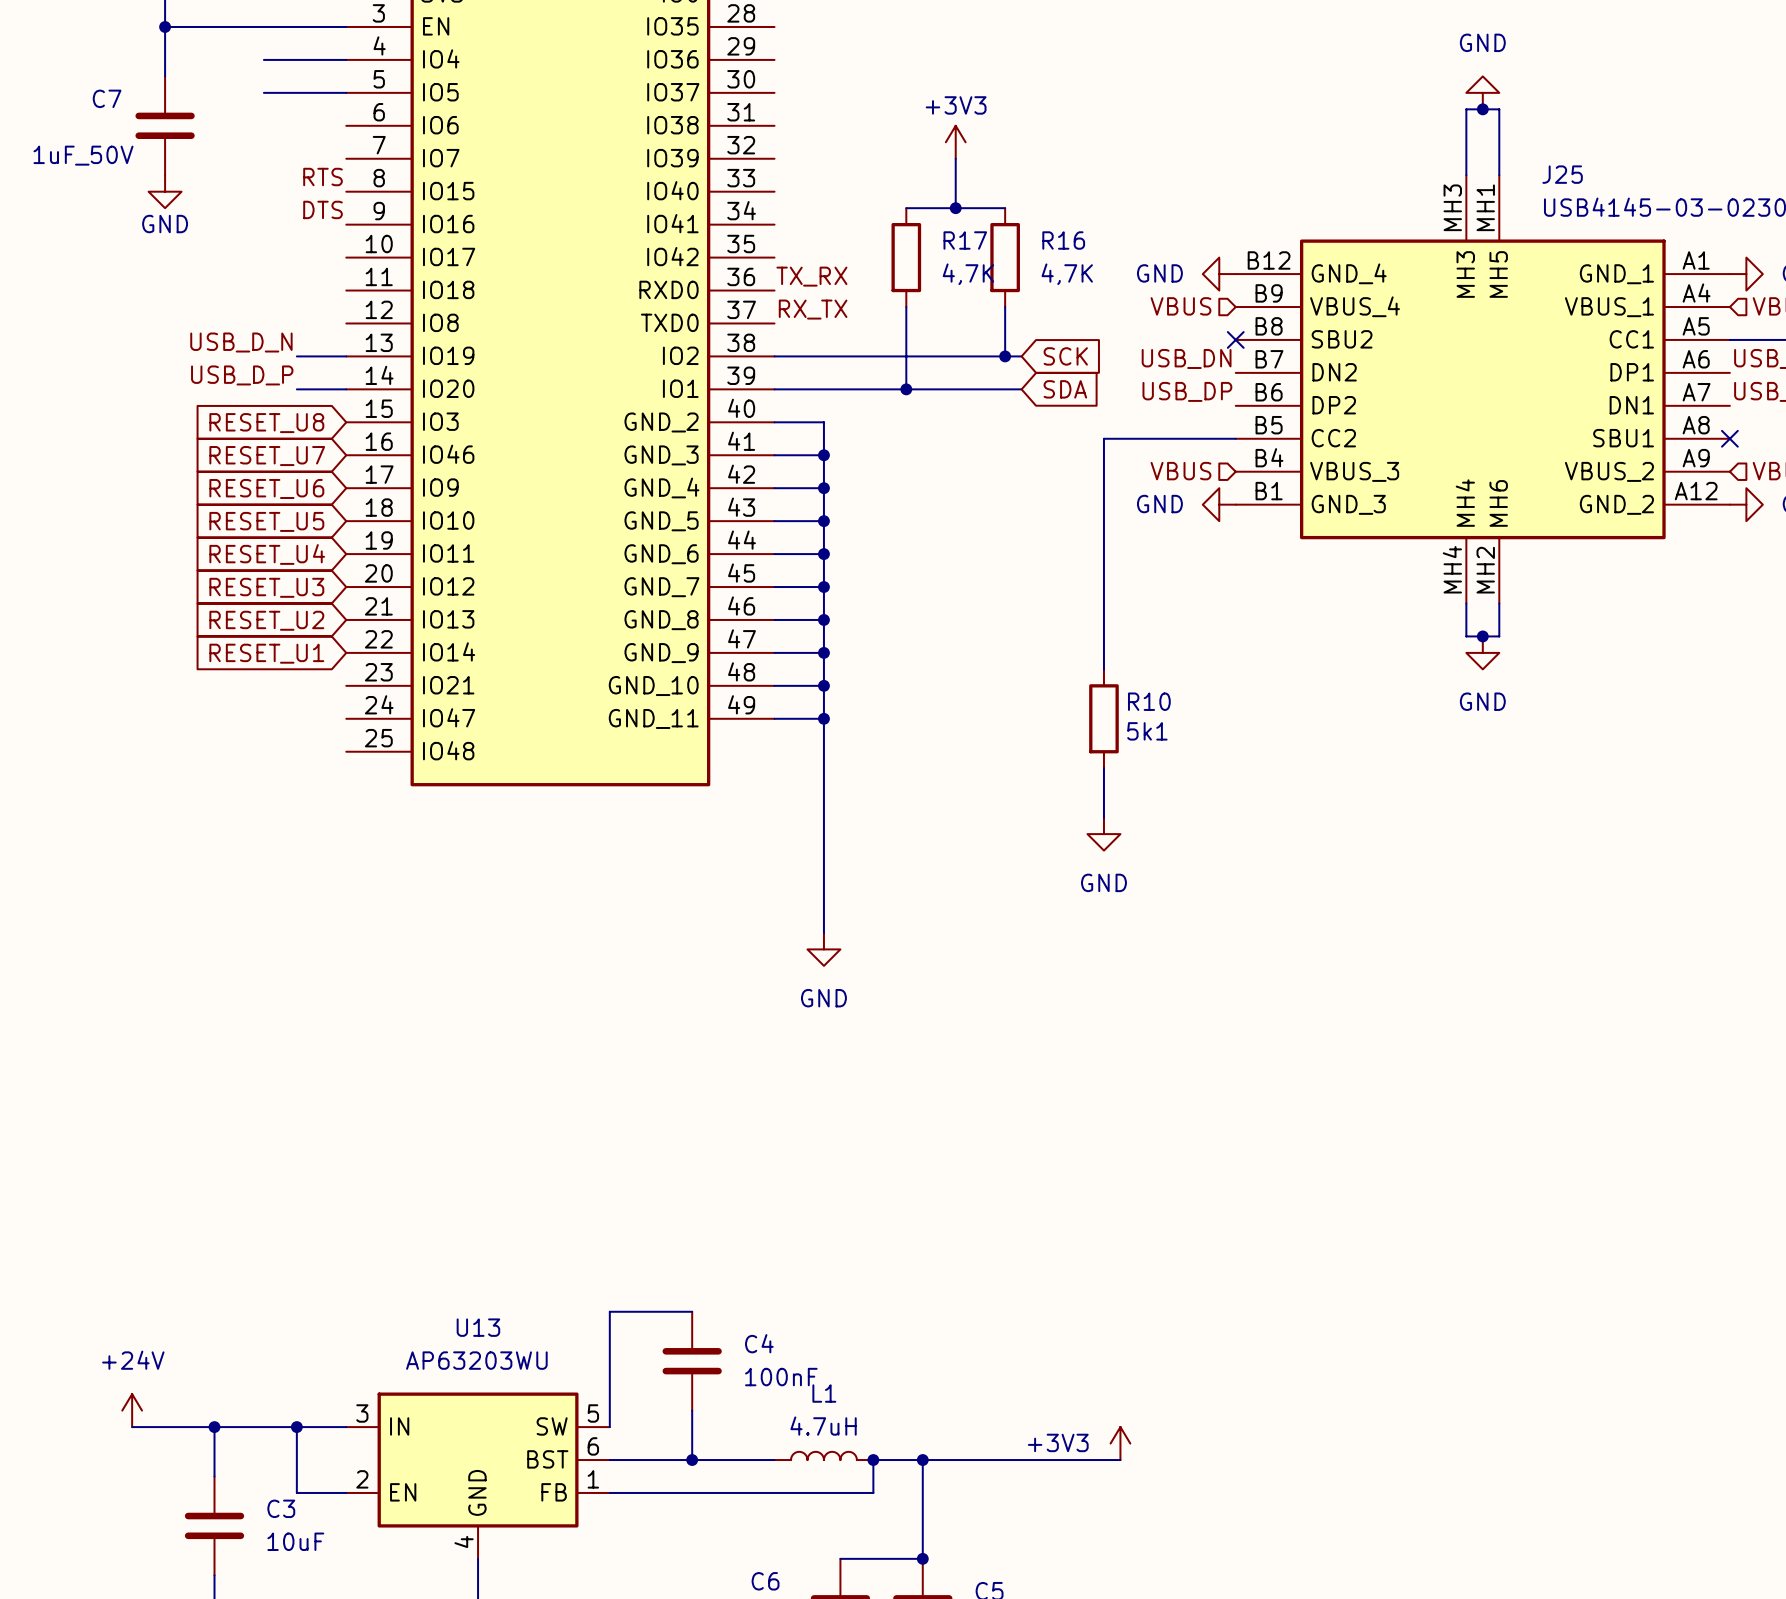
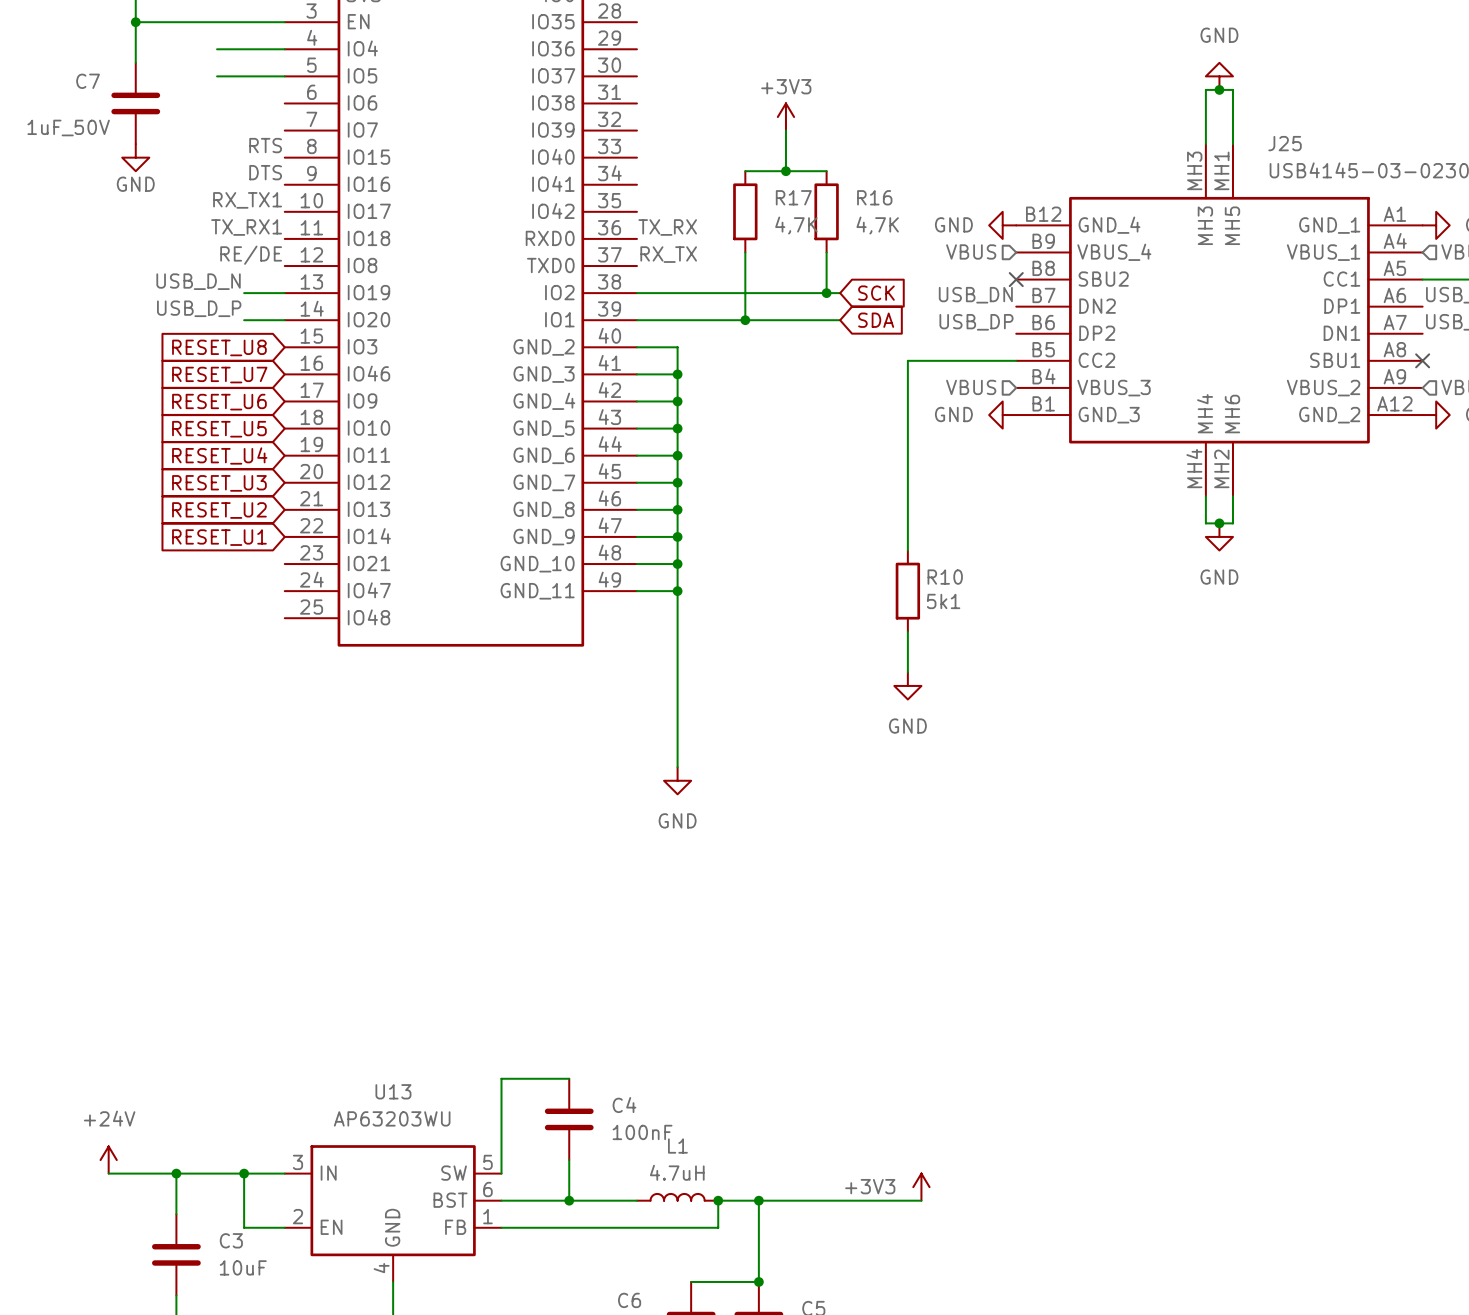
label: none -> RX_TX1 (247, 200)
label: none -> TX_RX1 (246, 227)
label: none -> RE/DE (251, 255)

